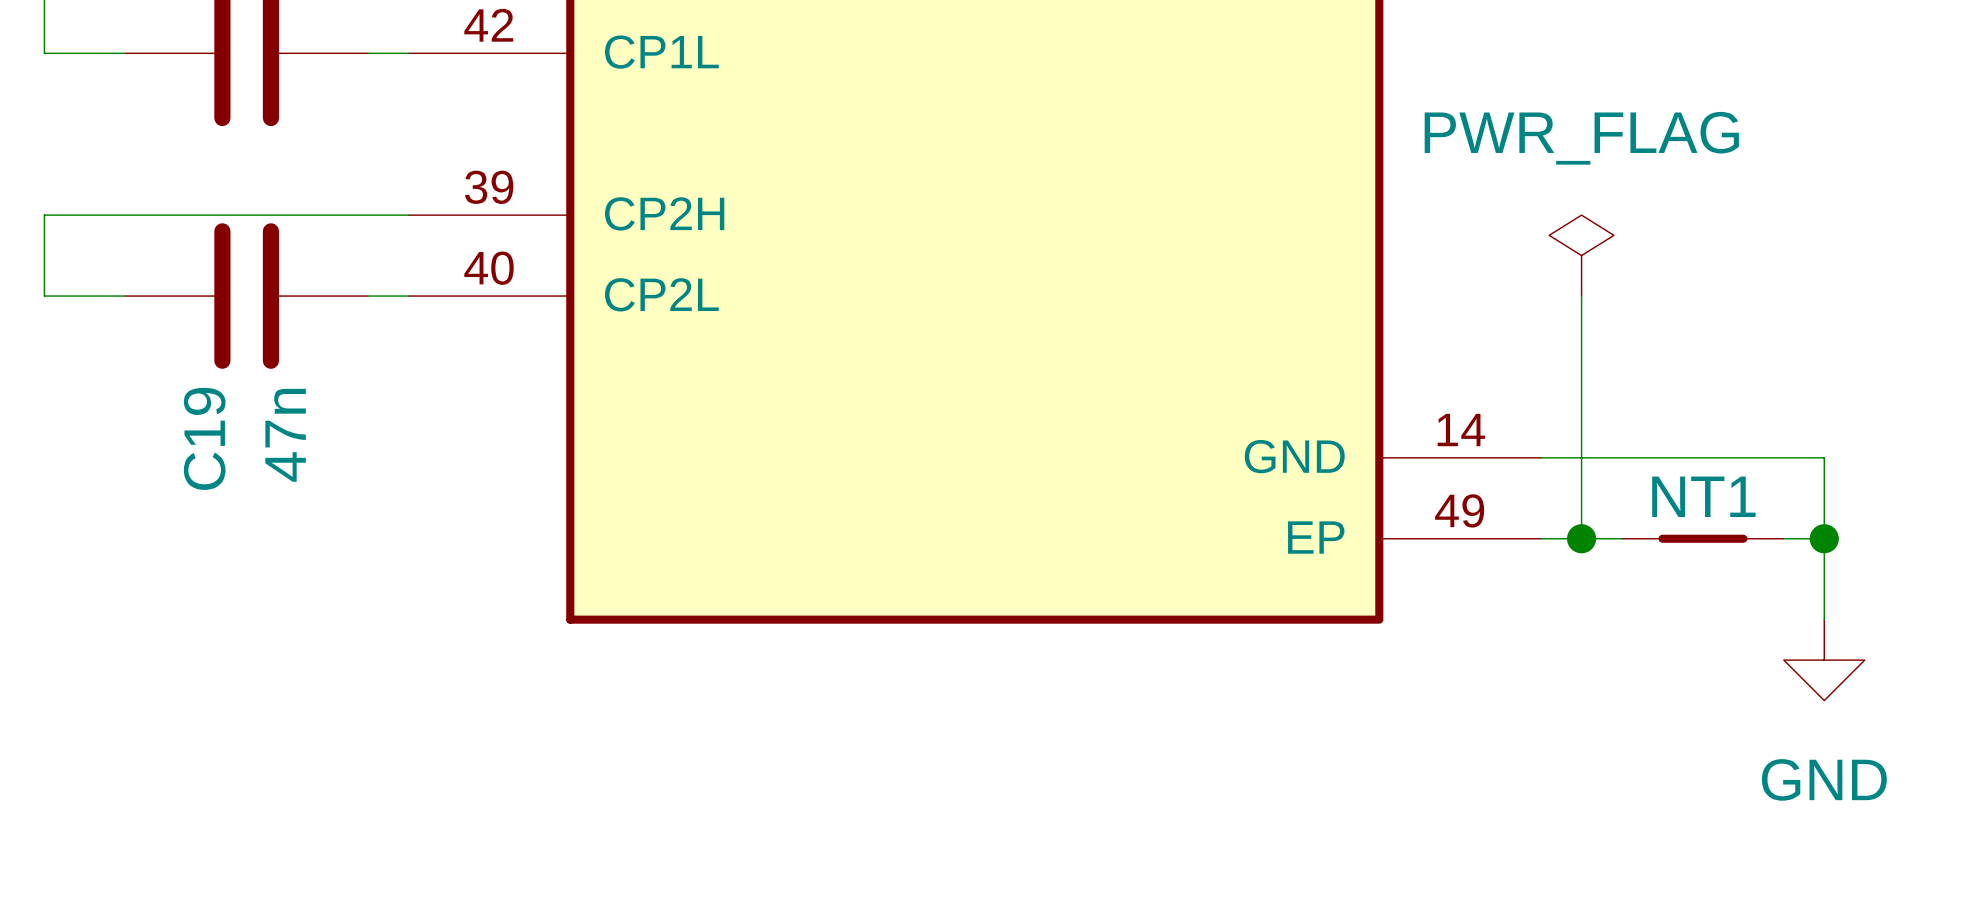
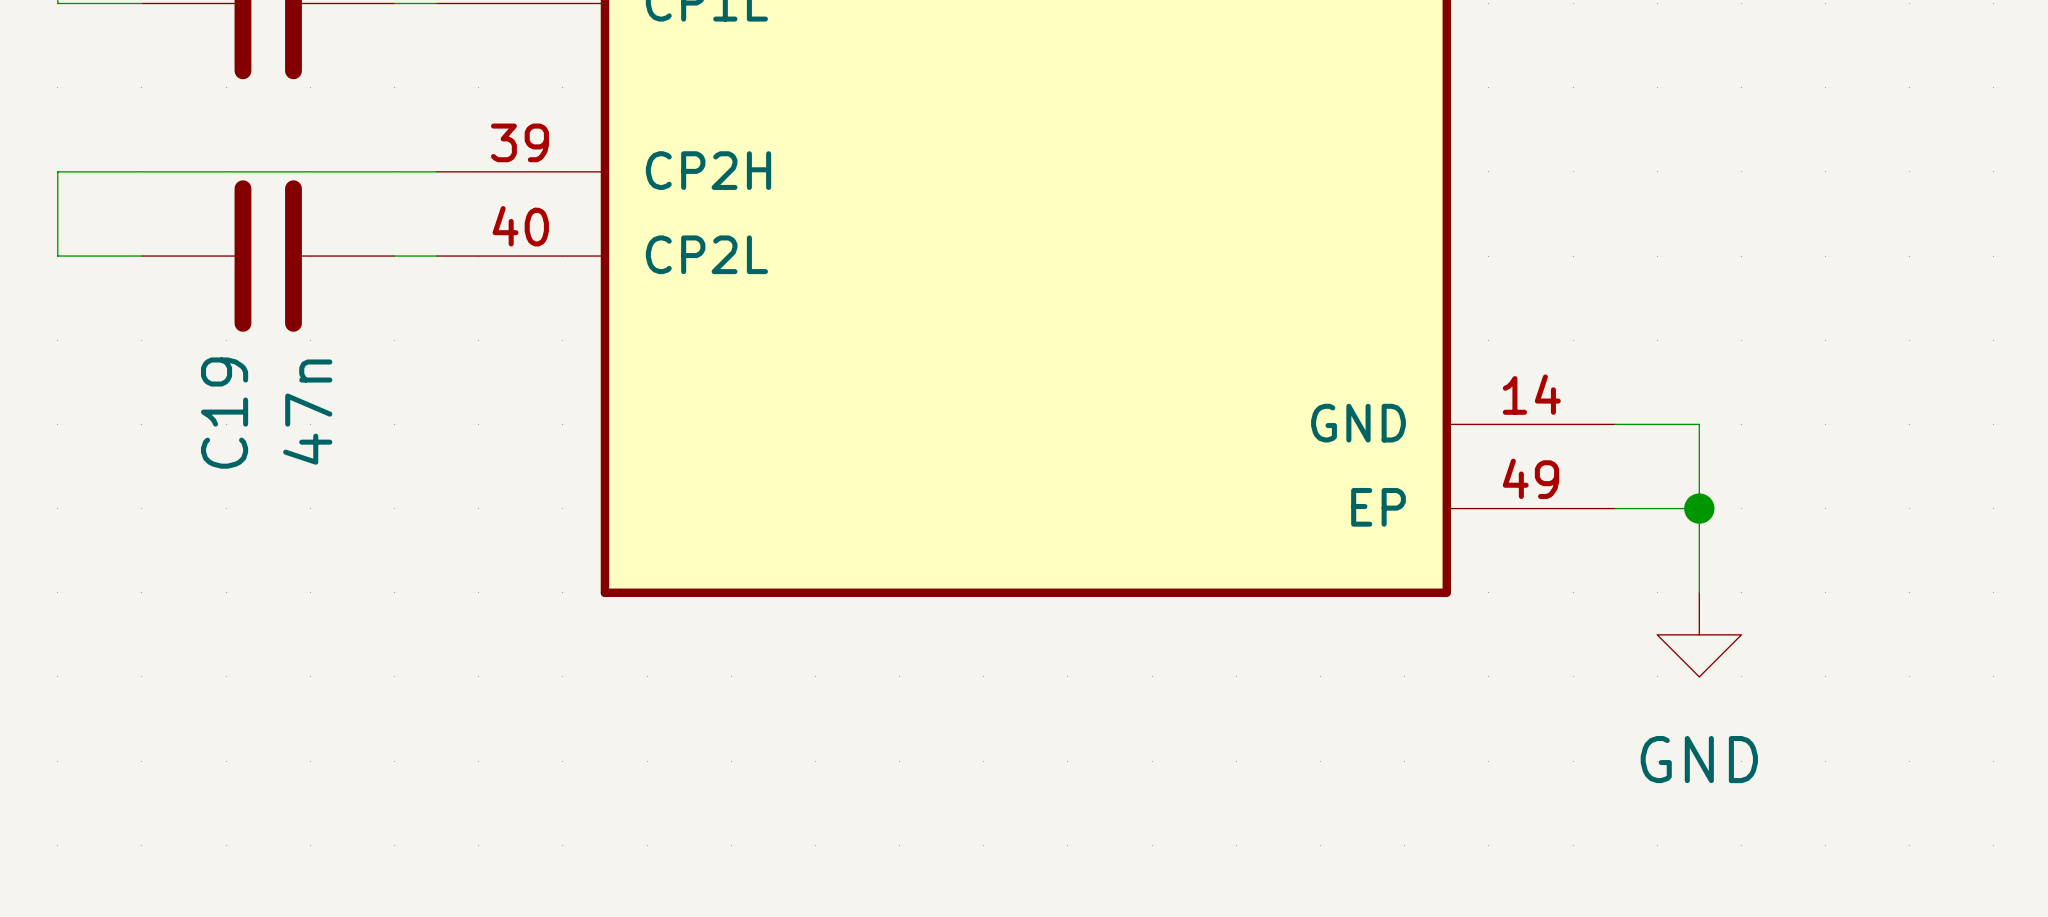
power symbol: PWR_FLAG (1581, 255) -> none
wire: (1581, 296) (1581, 538) -> none
wire: (1622, 457) (1824, 457) (1824, 619) -> (1699, 424) (1699, 592)
junction position: (1581, 538) -> (1699, 508)
NT1: (1702, 538) -> none
wire: (1783, 538) (1824, 538) -> none
junction: (1824, 538) -> none
power symbol position: GND (1824, 660) -> GND (1699, 634)

